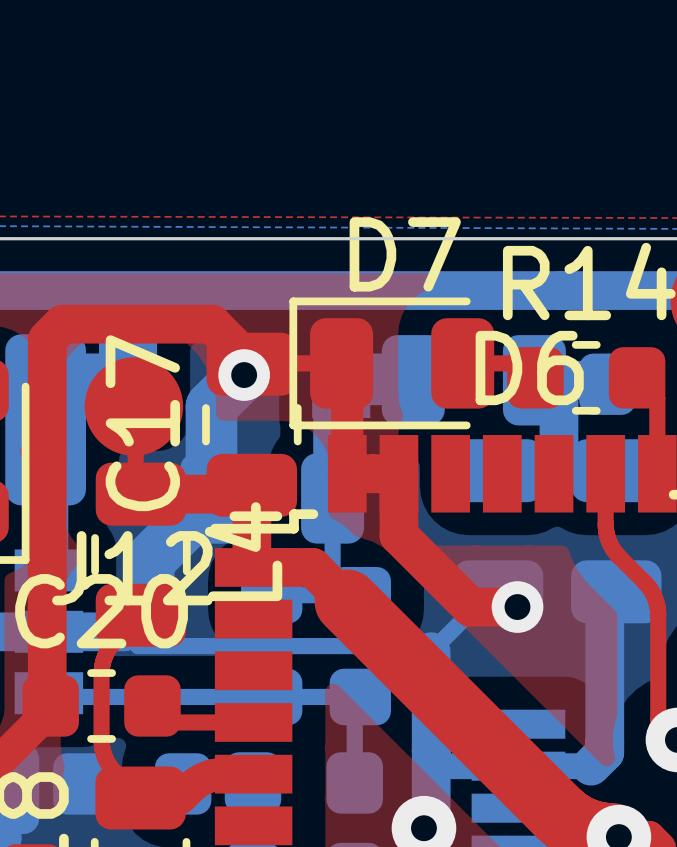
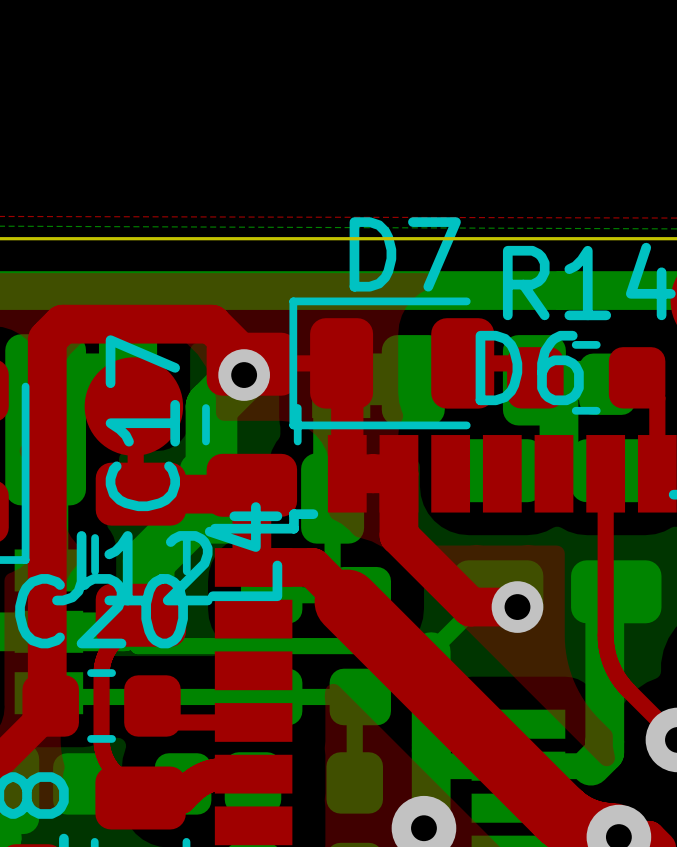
top track: (605, 523) (607, 537) (613, 549) (647, 585) (656, 603) (658, 720) -> (605, 523) (605, 635) (608, 654) (621, 681) (658, 720)

